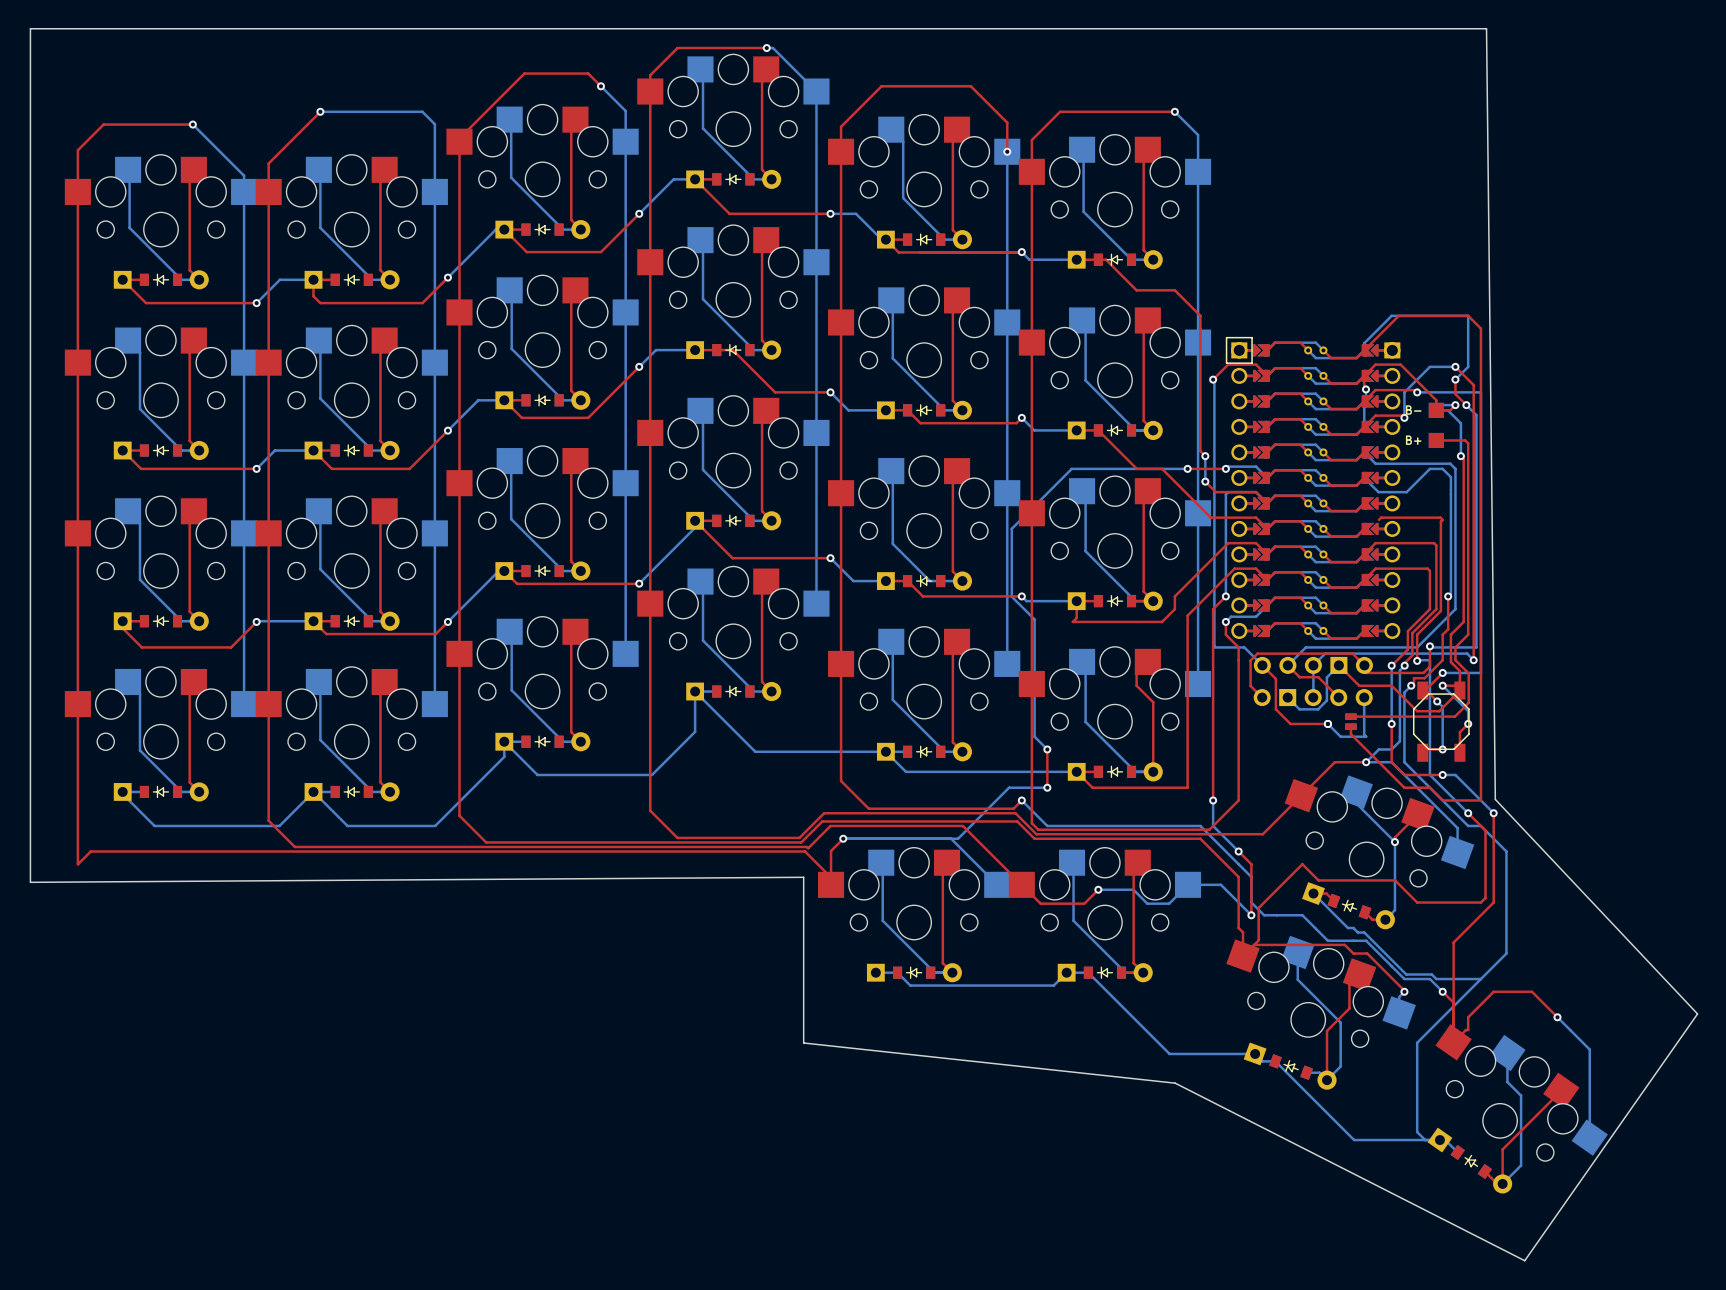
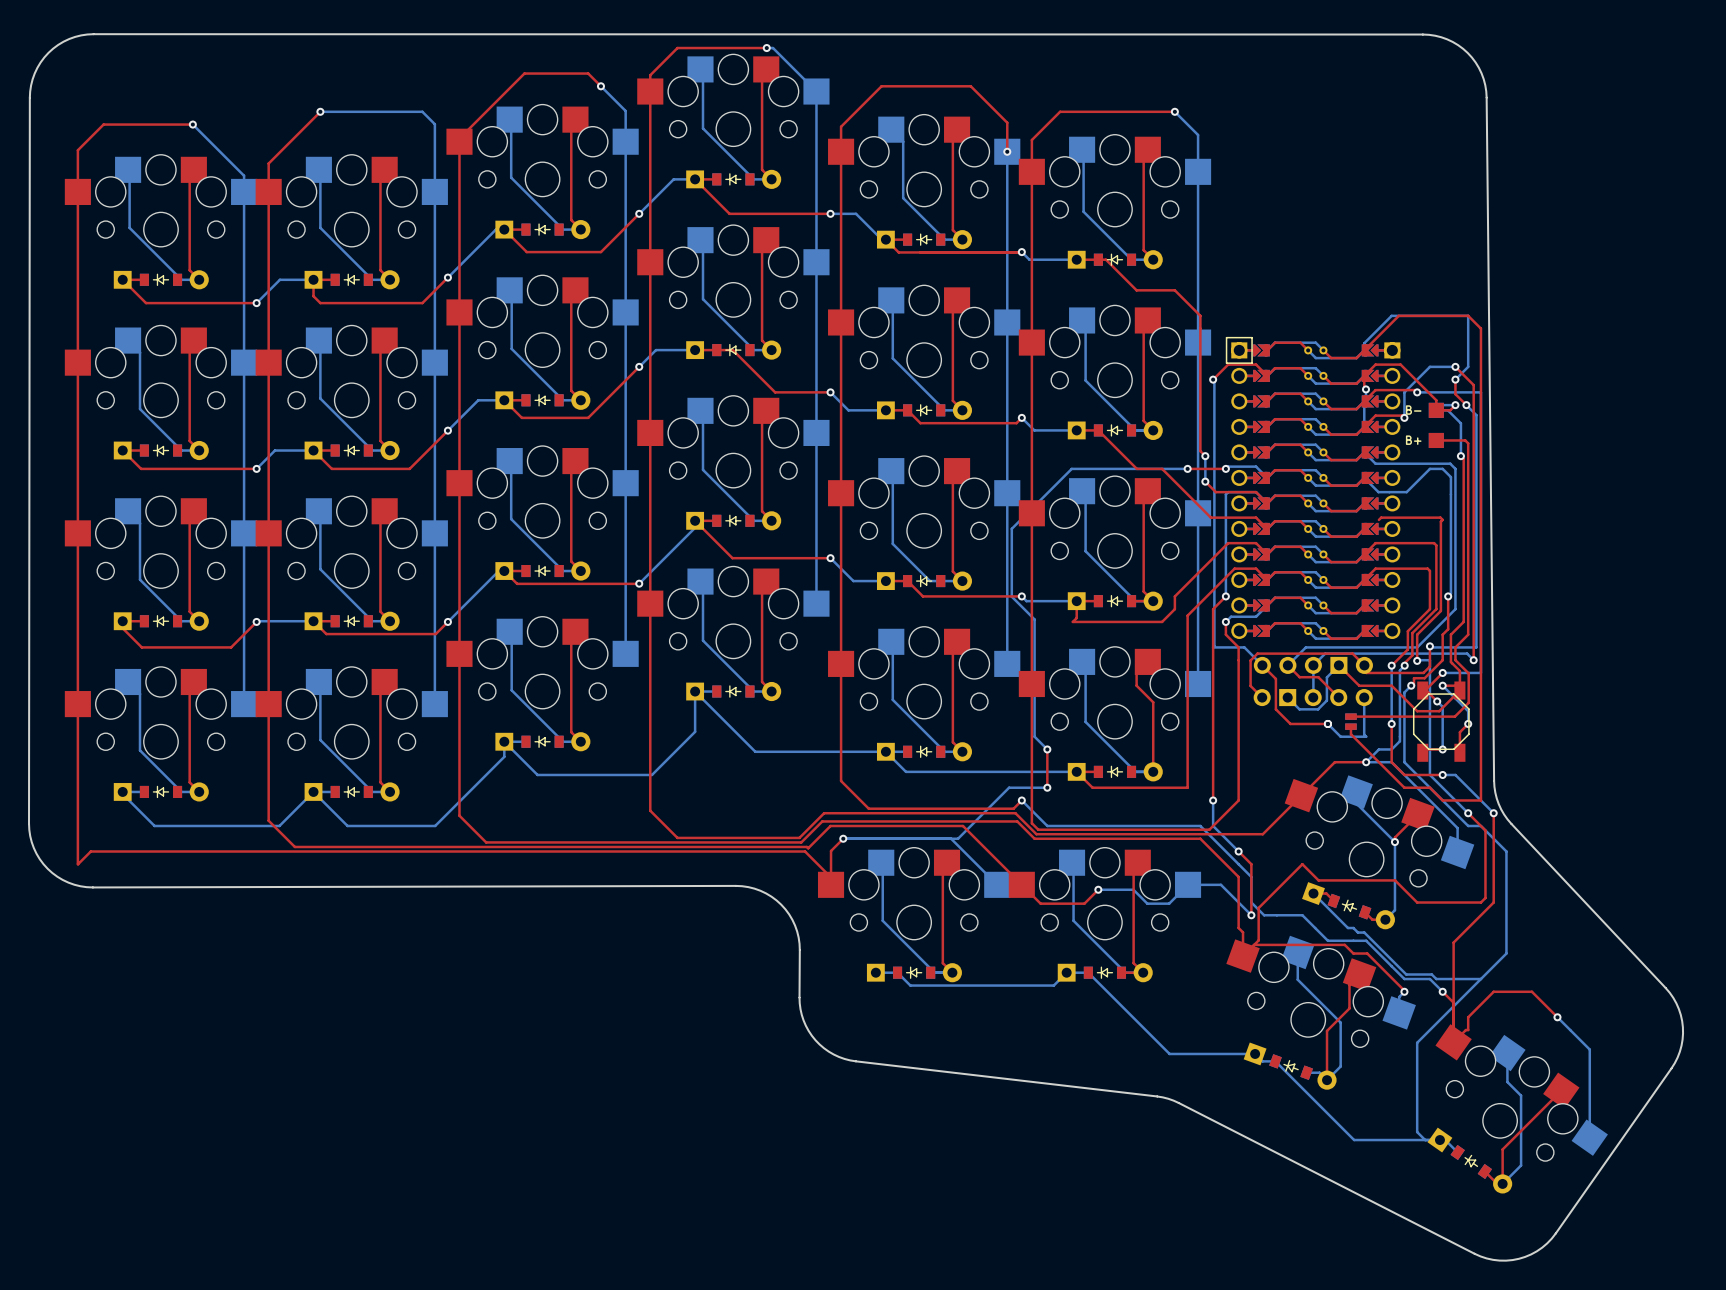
board edge: (30, 28) (30, 882) (803, 877) (803, 1043) (1175, 1083) (1524, 1260) (1697, 1013) (1495, 799) (1486, 28) (30, 28) -> (93, 34) (69, 39) (48, 52) (34, 73) (29, 97) (29, 823) (31, 842) (36, 853) (52, 873) (74, 884) (92, 887) (748, 887) (771, 896) (785, 909) (792, 919) (799, 943) (799, 1003) (803, 1020) (808, 1030) (819, 1044) (839, 1056) (855, 1061) (1168, 1098) (1480, 1256) (1499, 1260) (1518, 1258) (1536, 1251) (1551, 1238) (1674, 1063) (1681, 1045) (1682, 1027) (1678, 1009) (1669, 992) (1511, 823) (1501, 809) (1495, 792) (1486, 97) (1481, 73) (1475, 62) (1463, 48) (1441, 37) (1422, 34) (93, 34)

